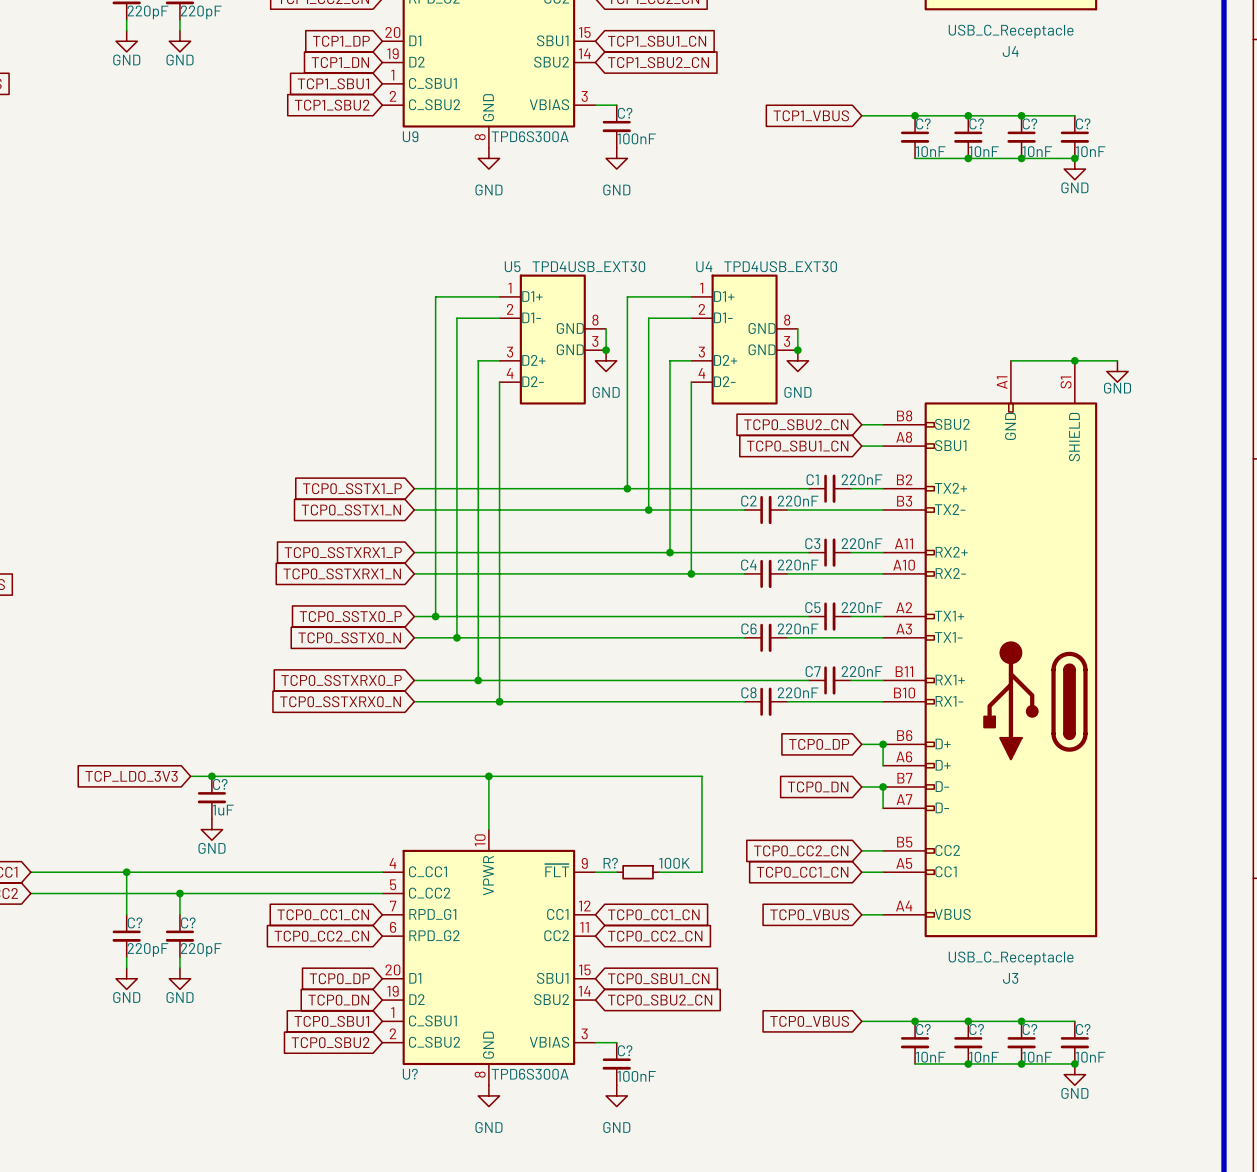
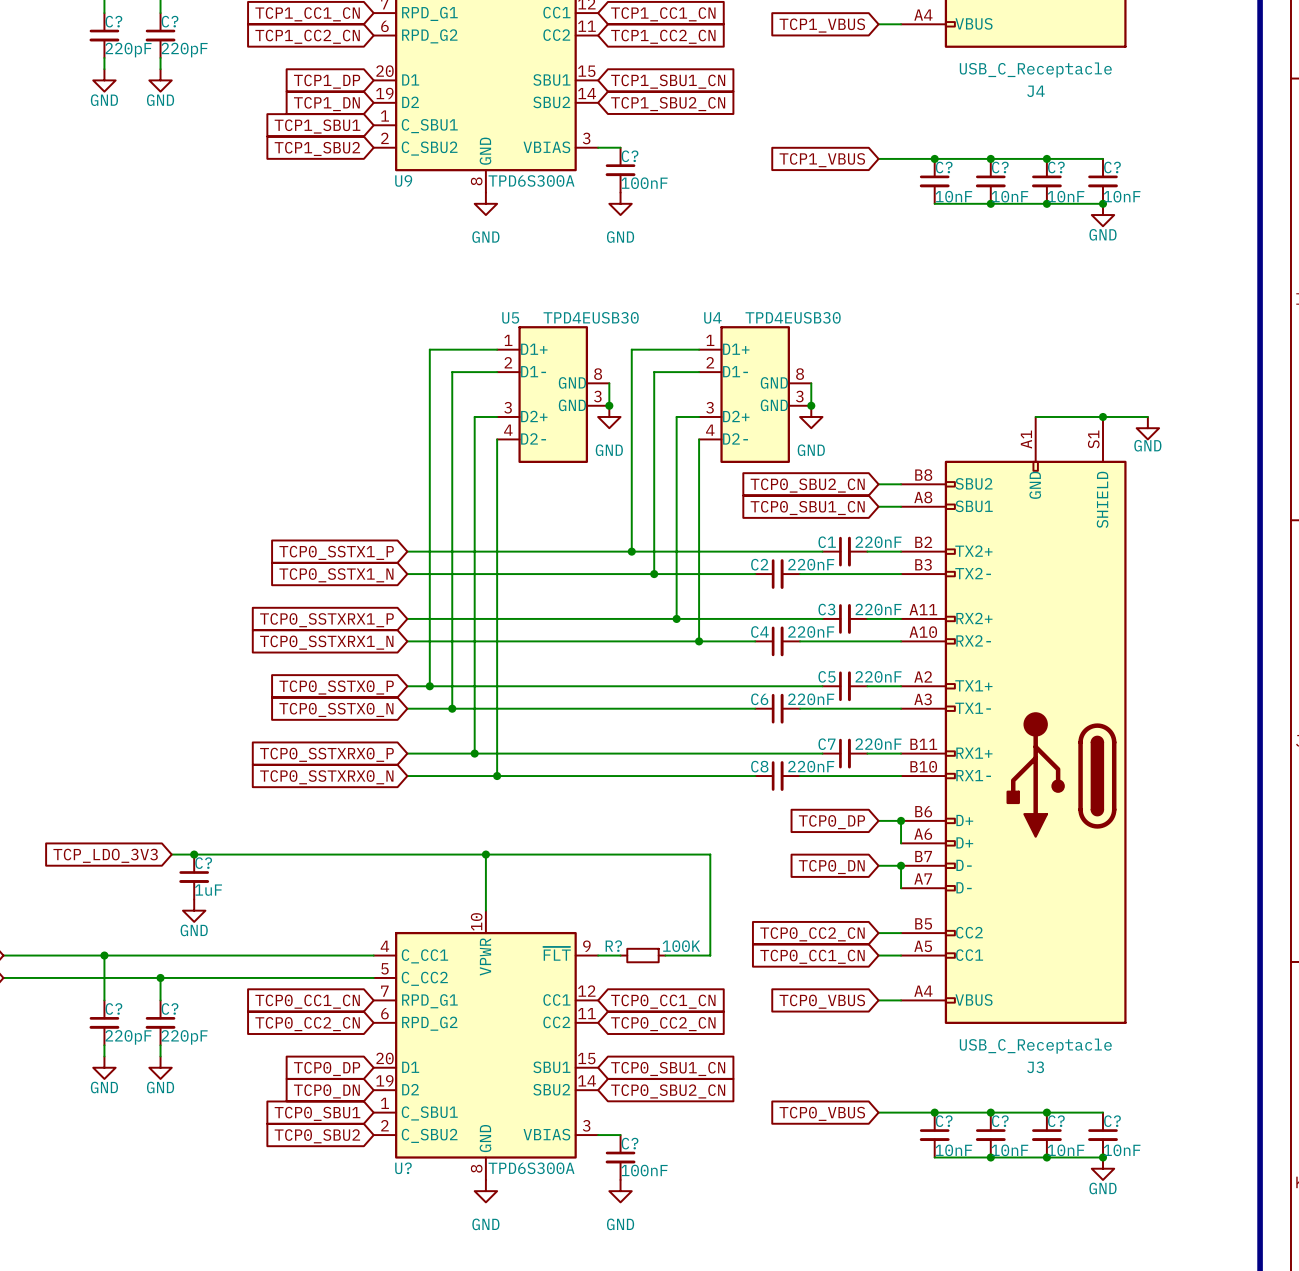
U5 value: TPD4USB_EXT30 (588, 266) -> TPD4EUSB30 (591, 317)
U4 value: TPD4USB_EXT30 (780, 266) -> TPD4EUSB30 (793, 317)

